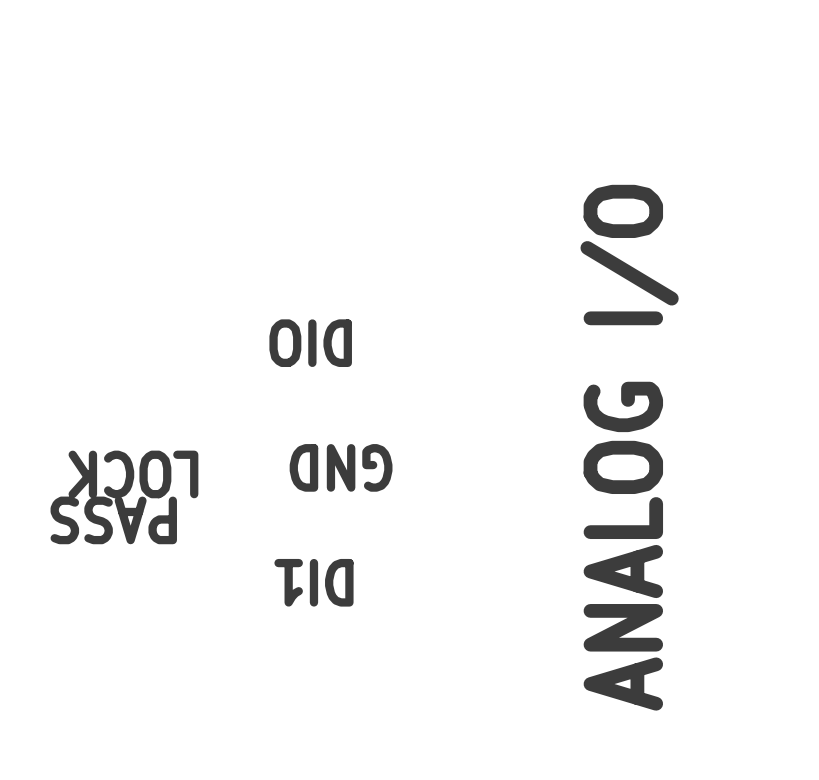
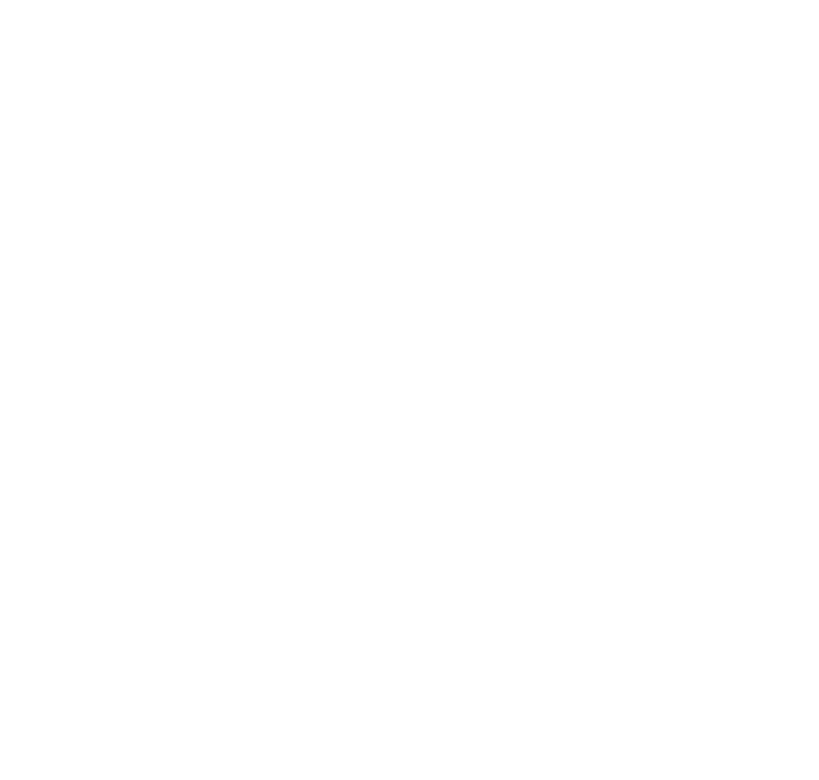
text: DIO (310, 343) -> none
text: ANALOG I/O (629, 447) -> none
text: GND (341, 467) -> none
text: LOCK (133, 474) -> none
text: PASS (113, 520) -> none
text: DI1 (313, 582) -> none

